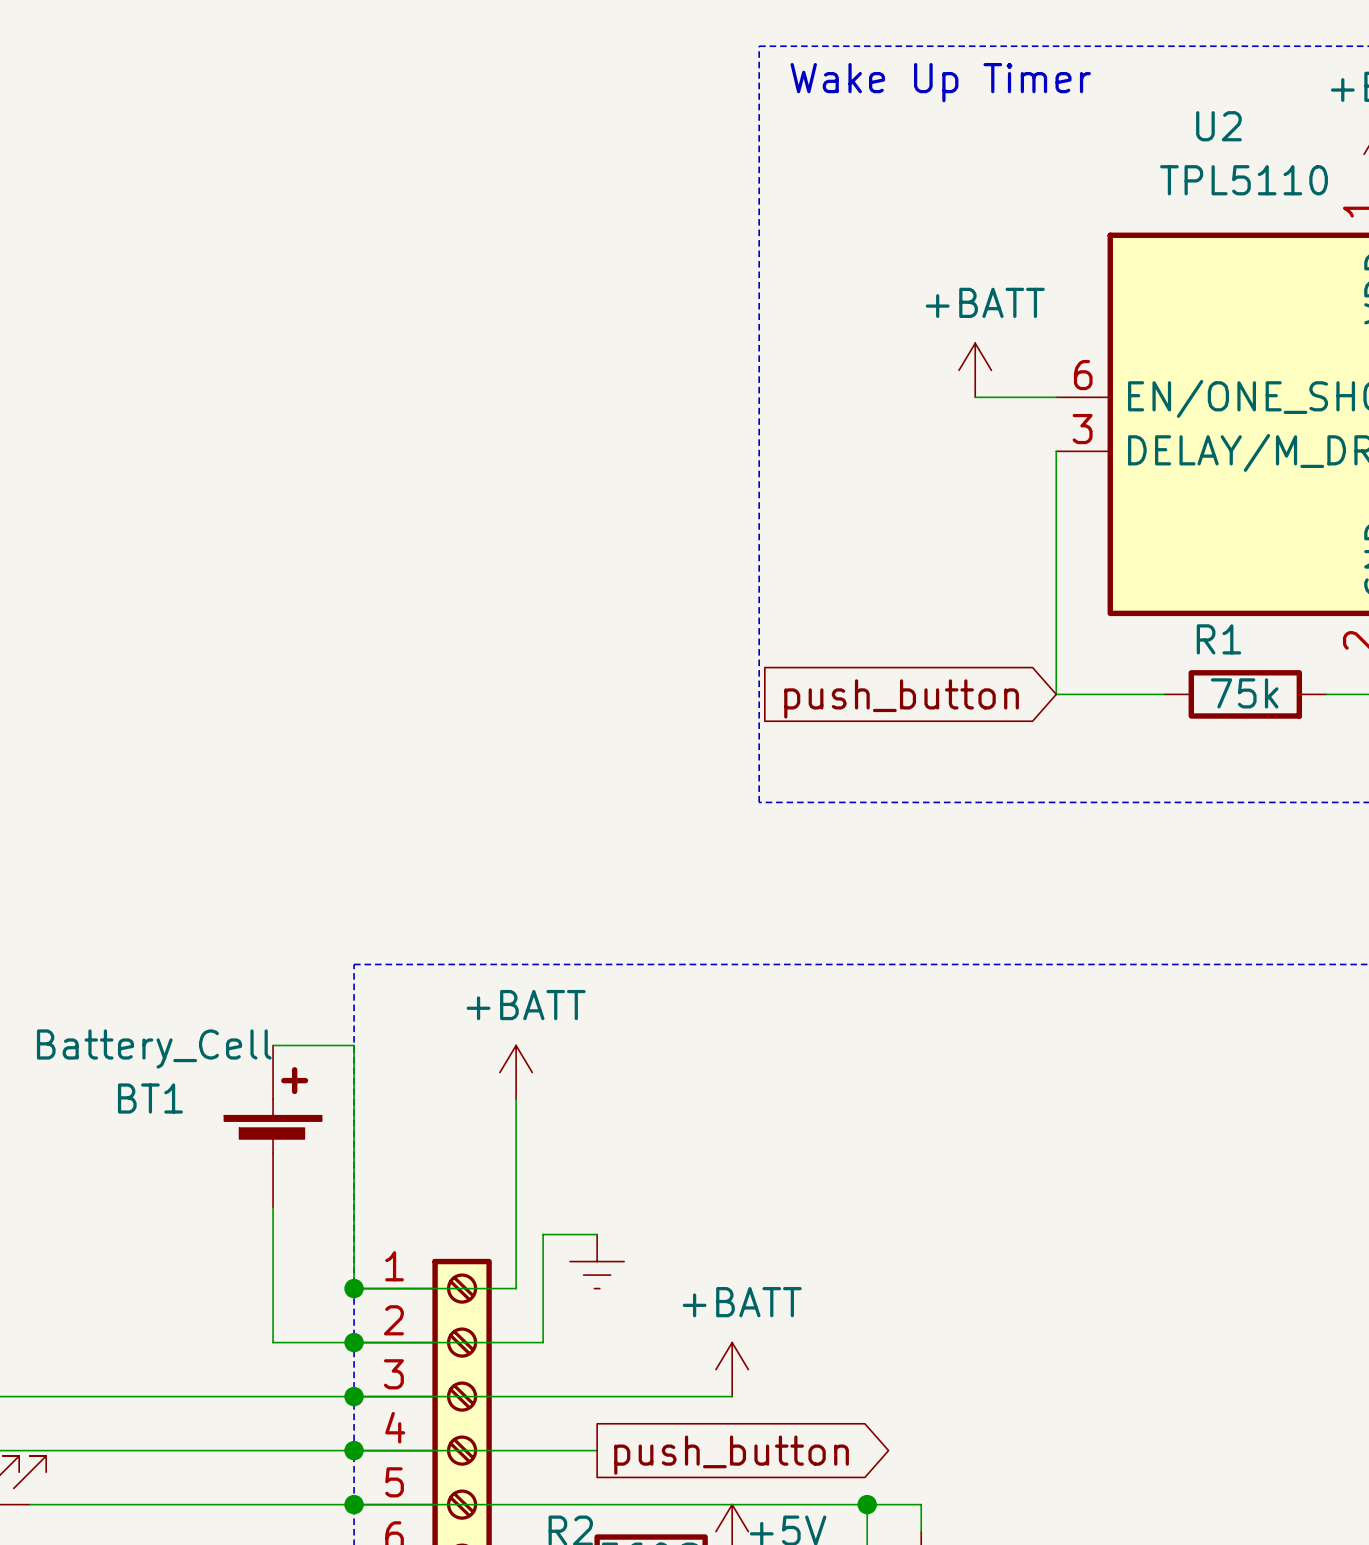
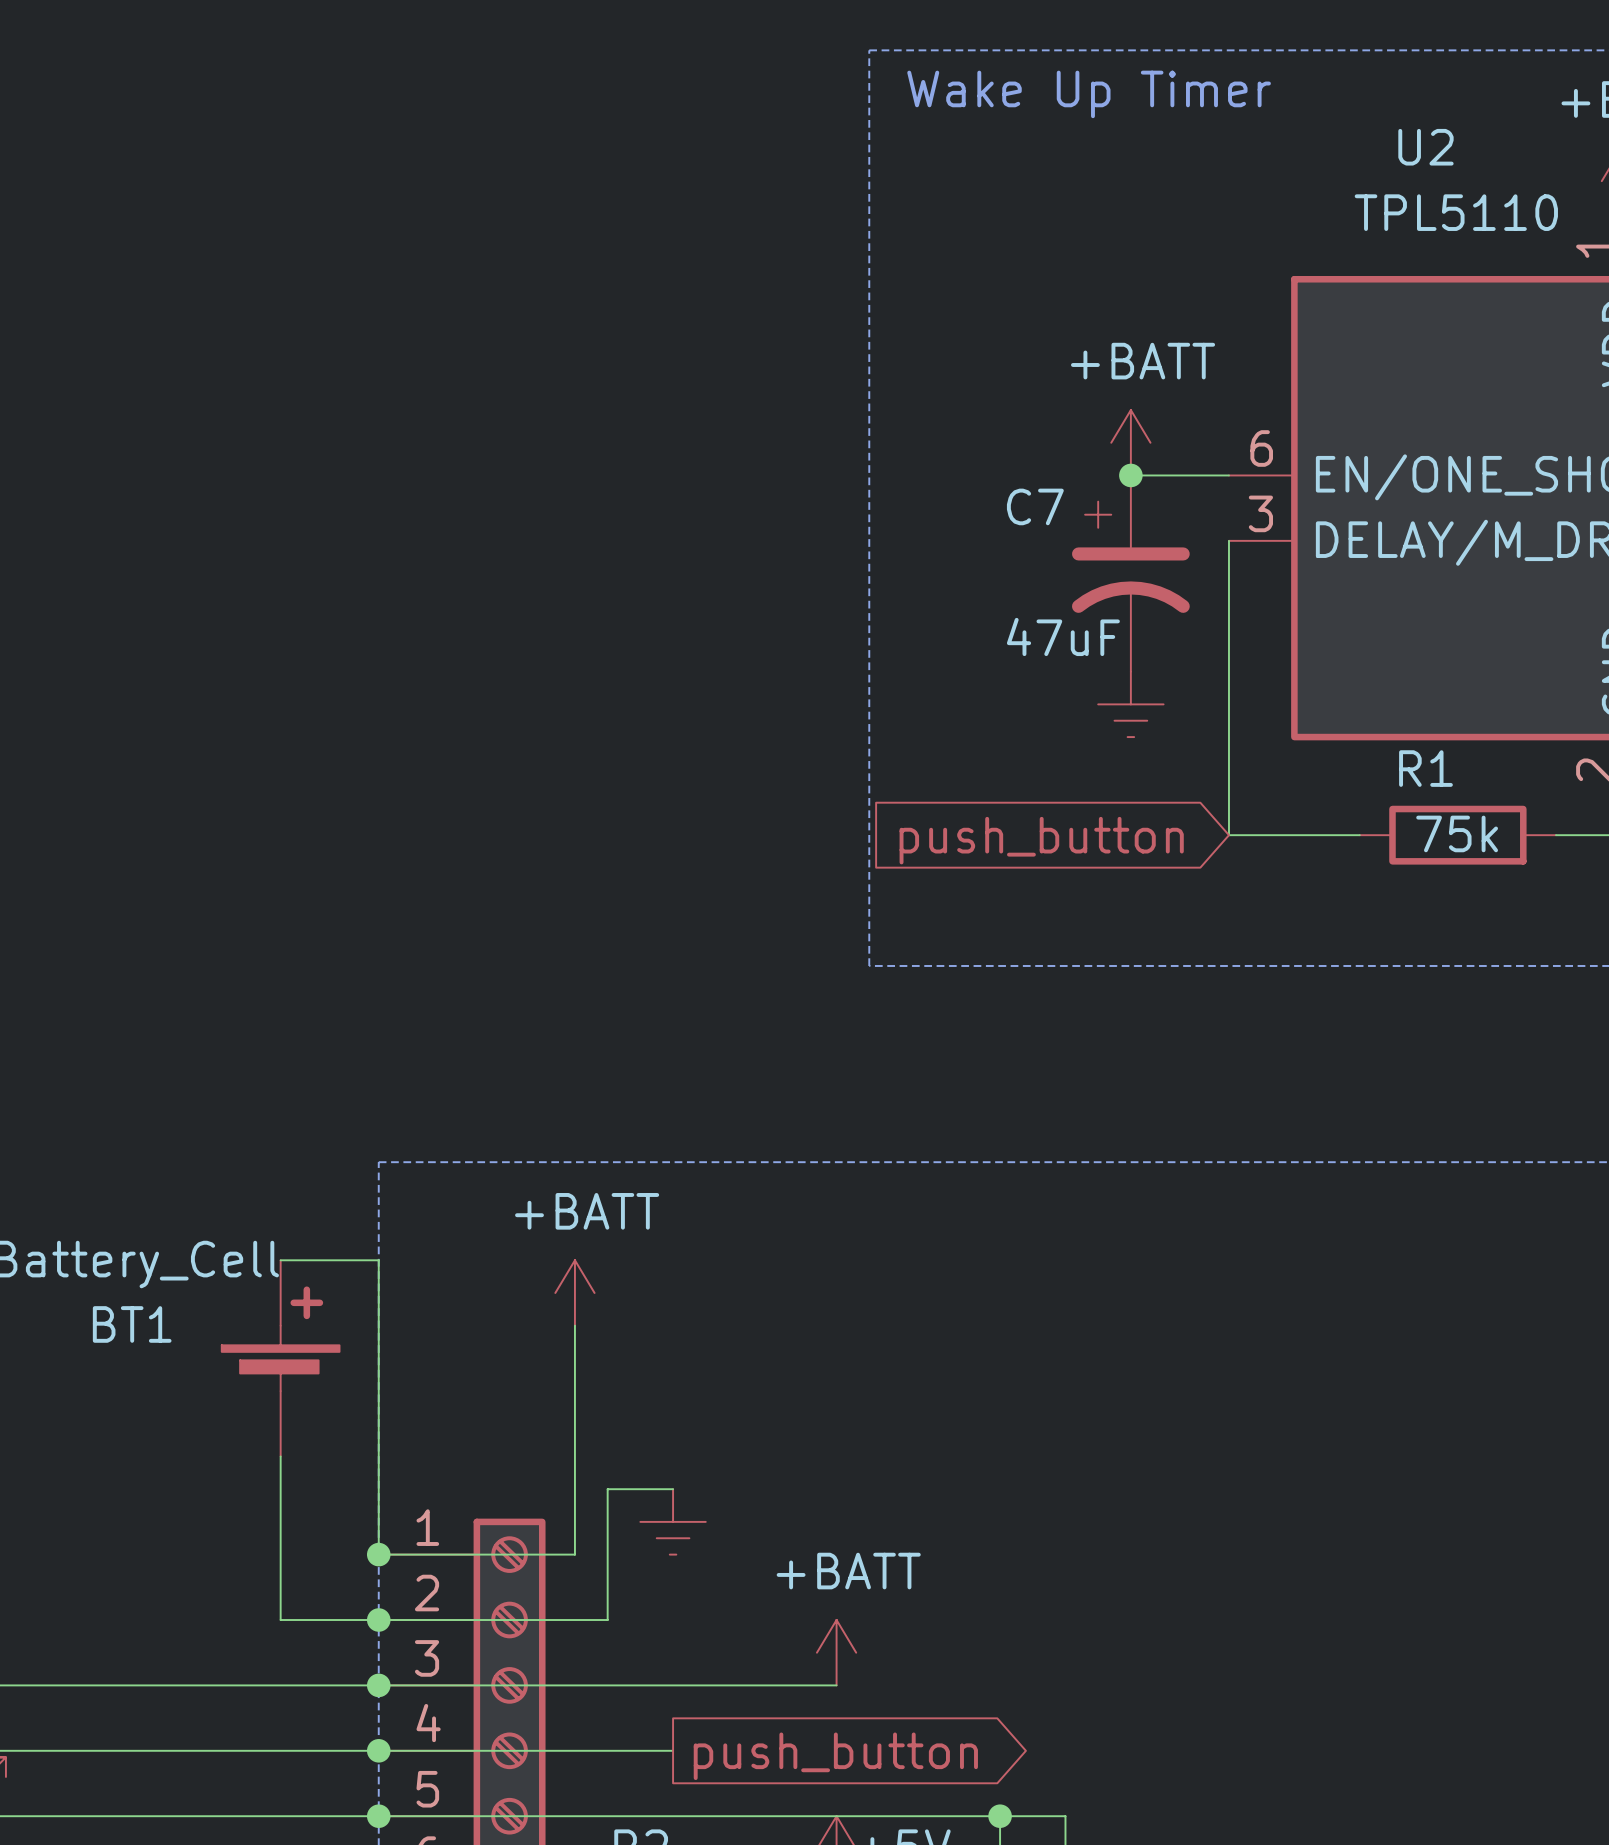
junction: none -> (1130, 475)
C7: none -> 47uF (1130, 573)
power symbol: none -> (1130, 704)

